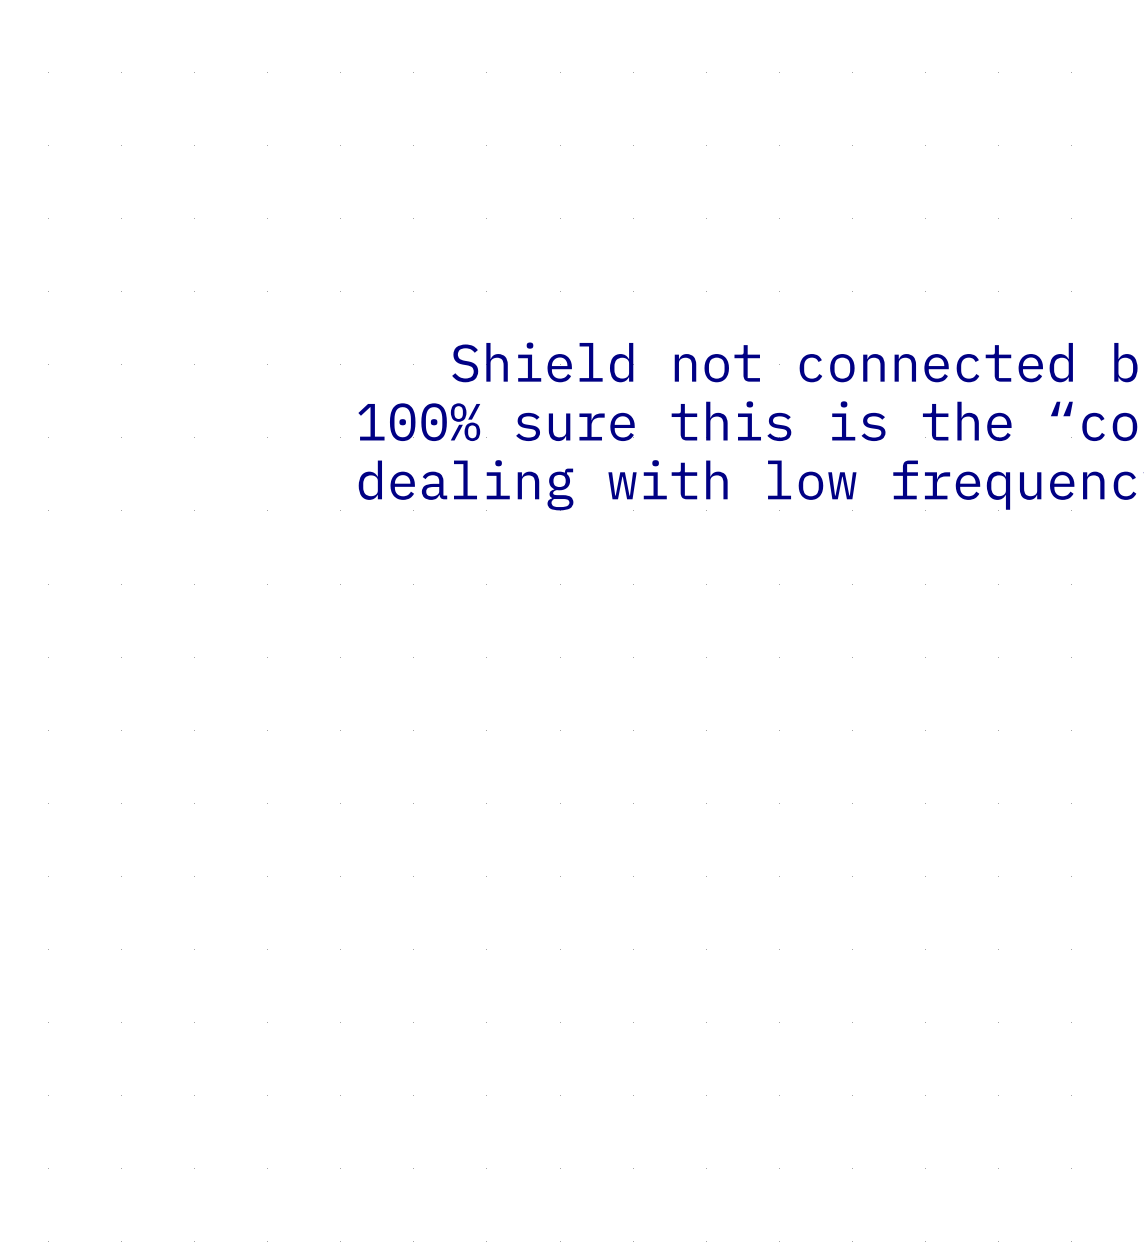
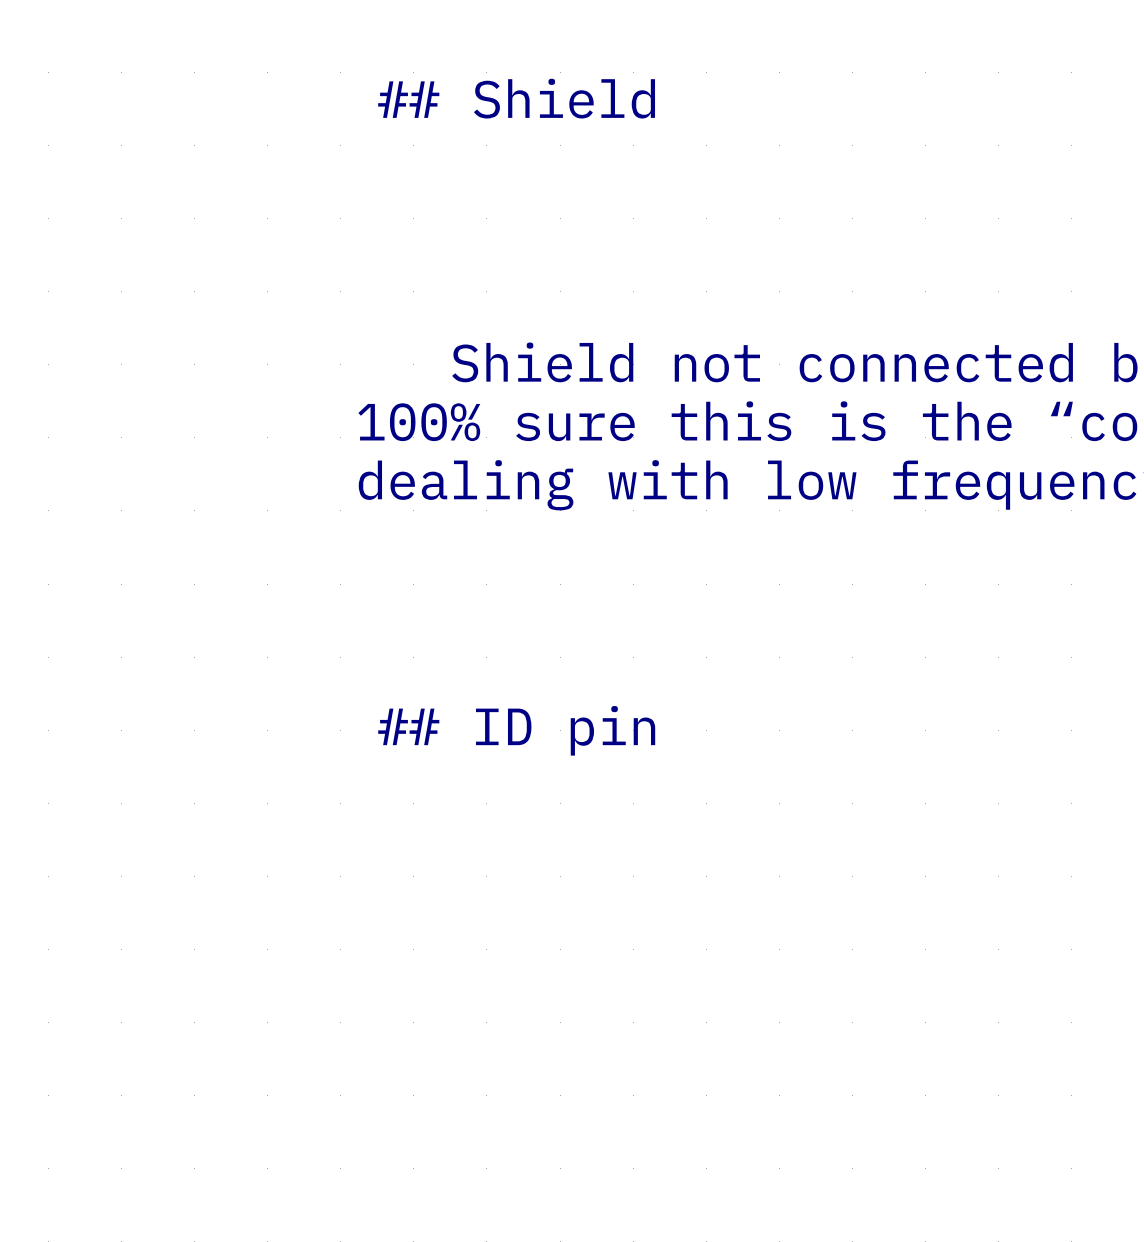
text: none -> ## Shield (516, 98)
text: none -> ## ID pin (516, 730)

